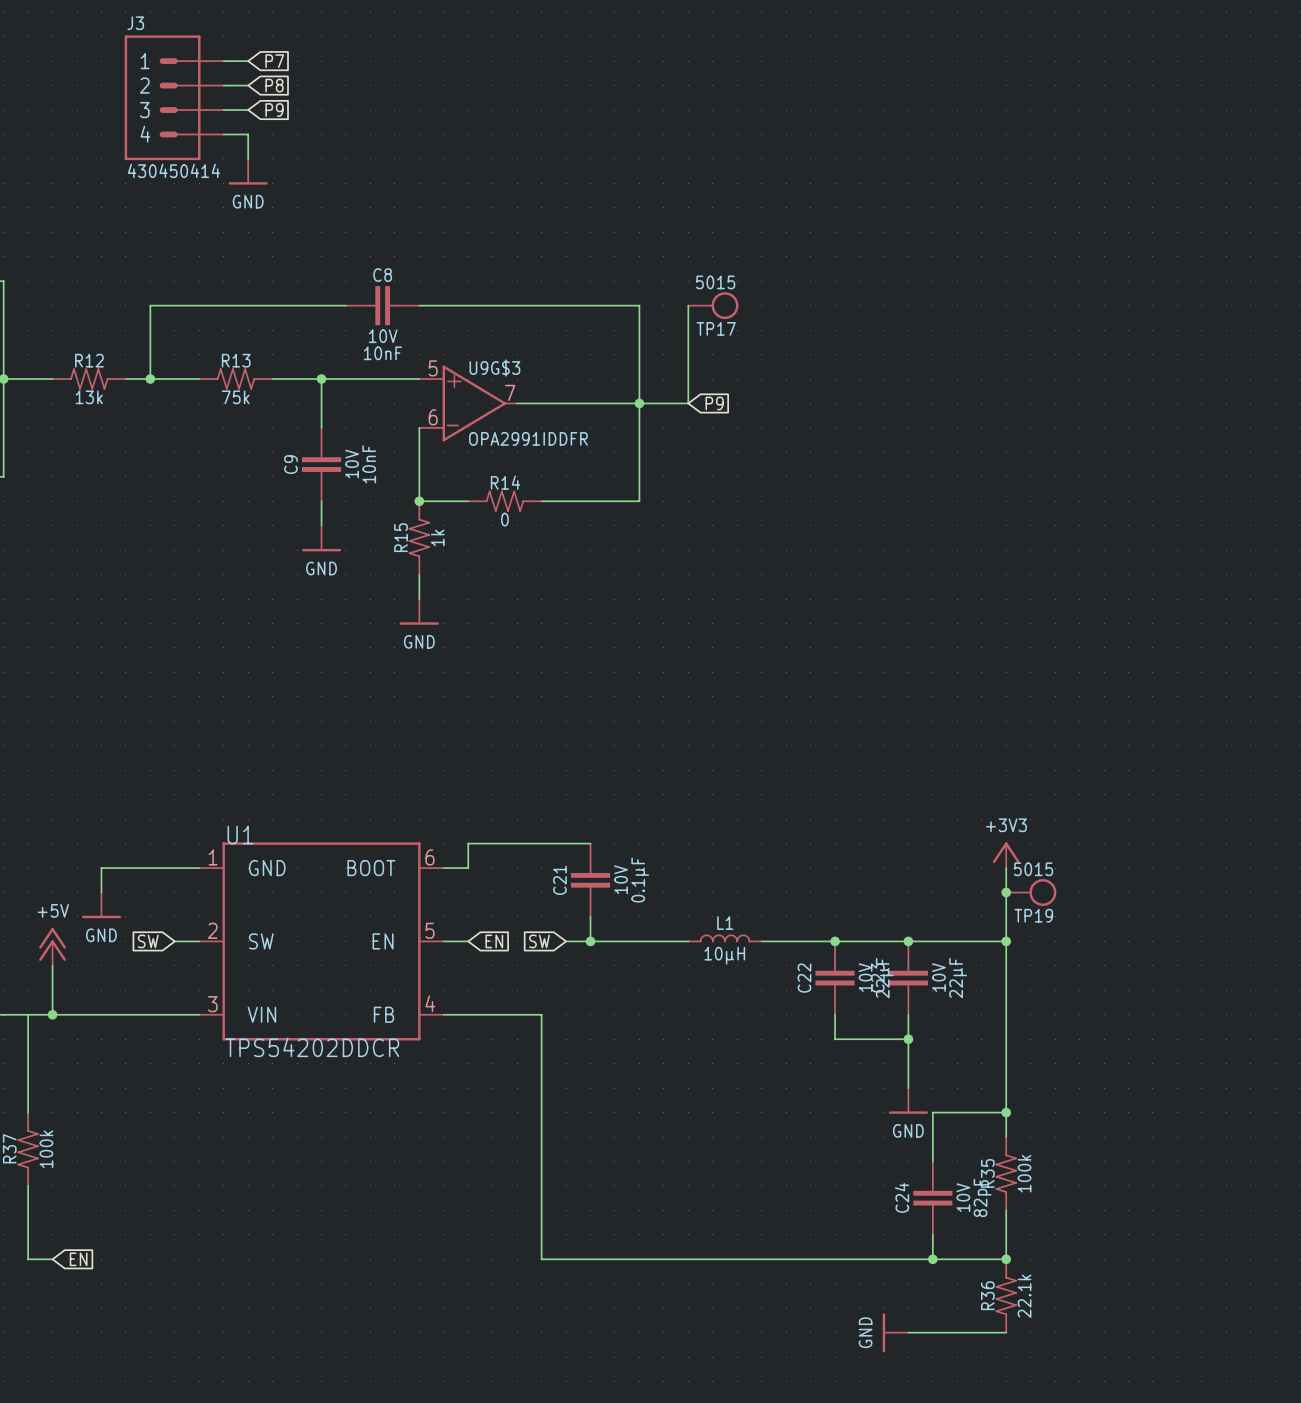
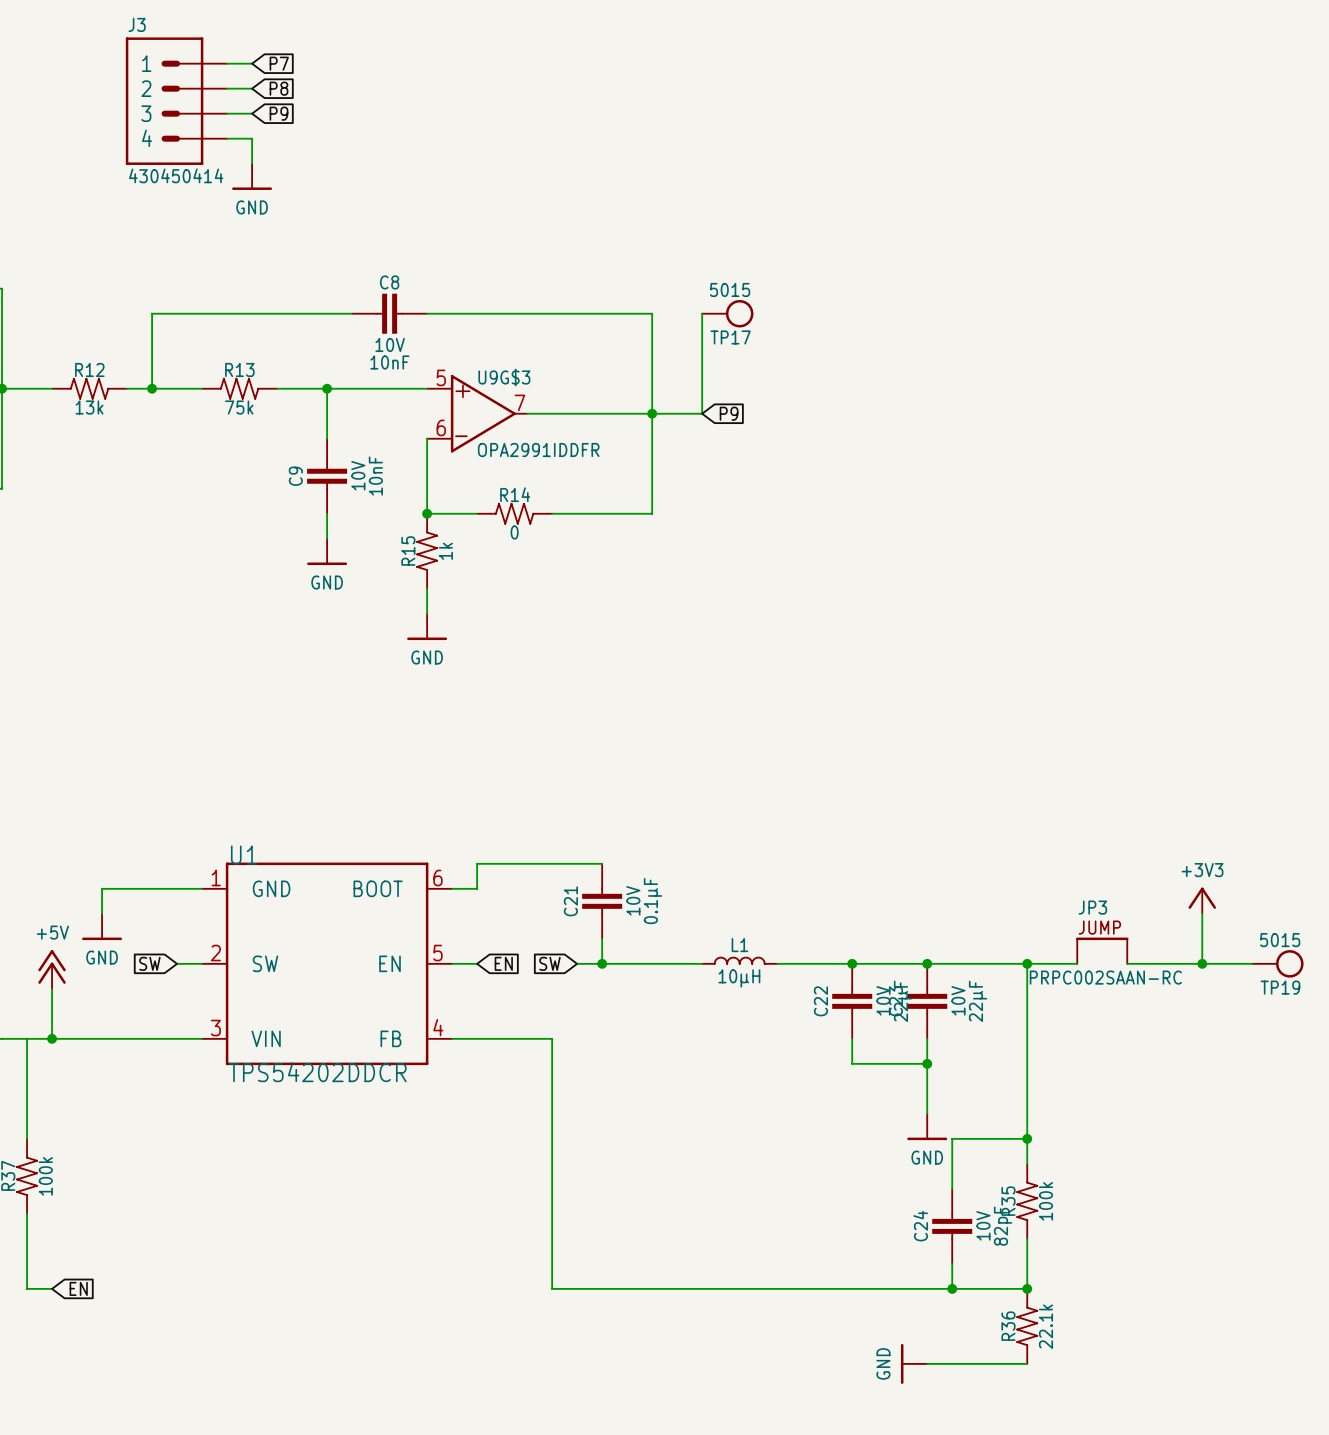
power symbol position: +3V3 (1006, 855) -> +3V3 (1202, 900)
wire: (1006, 868) (1006, 941) -> (1077, 963) (1027, 963)
junction: (1006, 892) -> none
TP19 position: (1031, 892) -> (1277, 963)
wire: none -> (1202, 913) (1202, 963)
JP3: none -> (1102, 950)
wire: none -> (1127, 963) (1252, 963)
junction: none -> (1202, 963)

